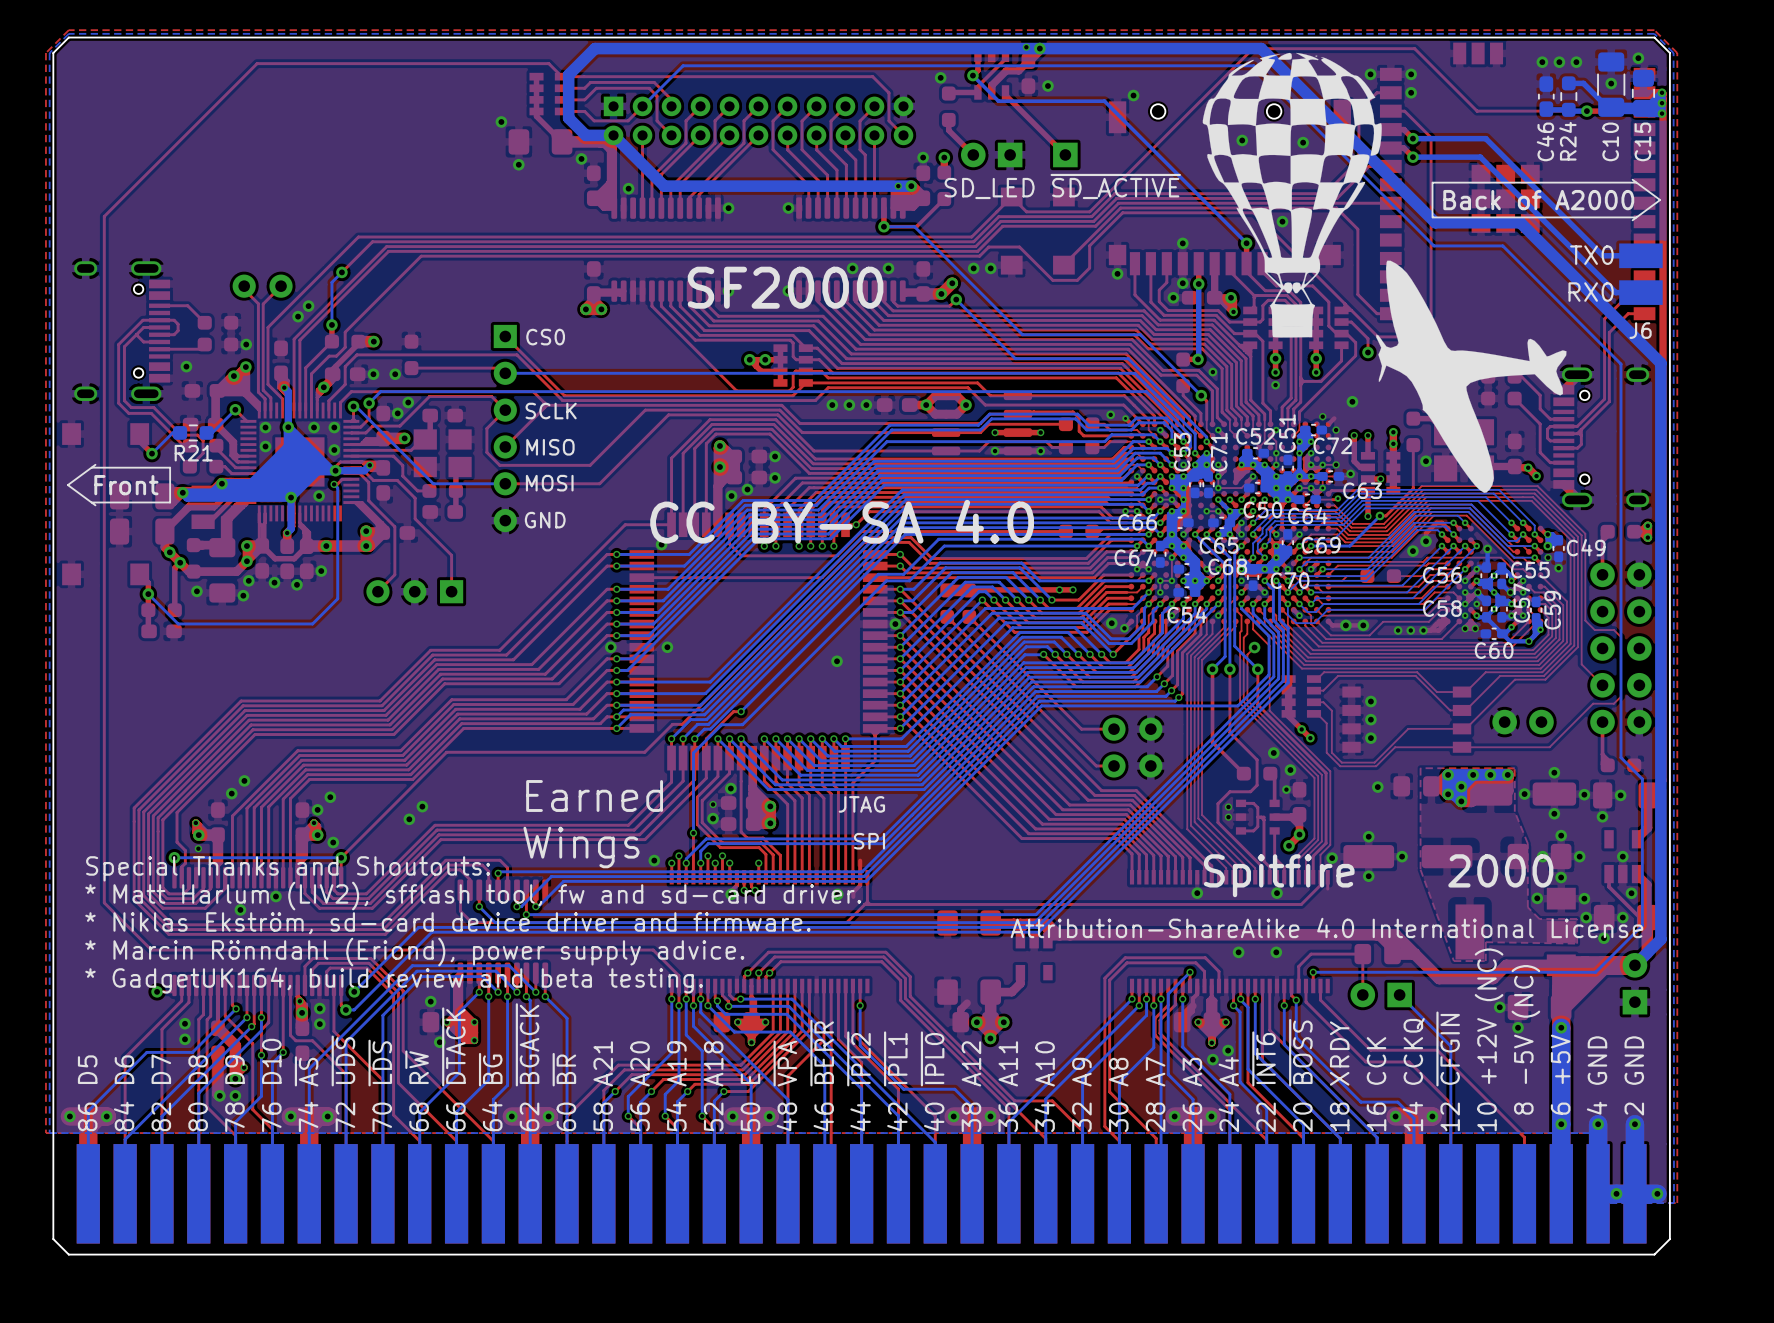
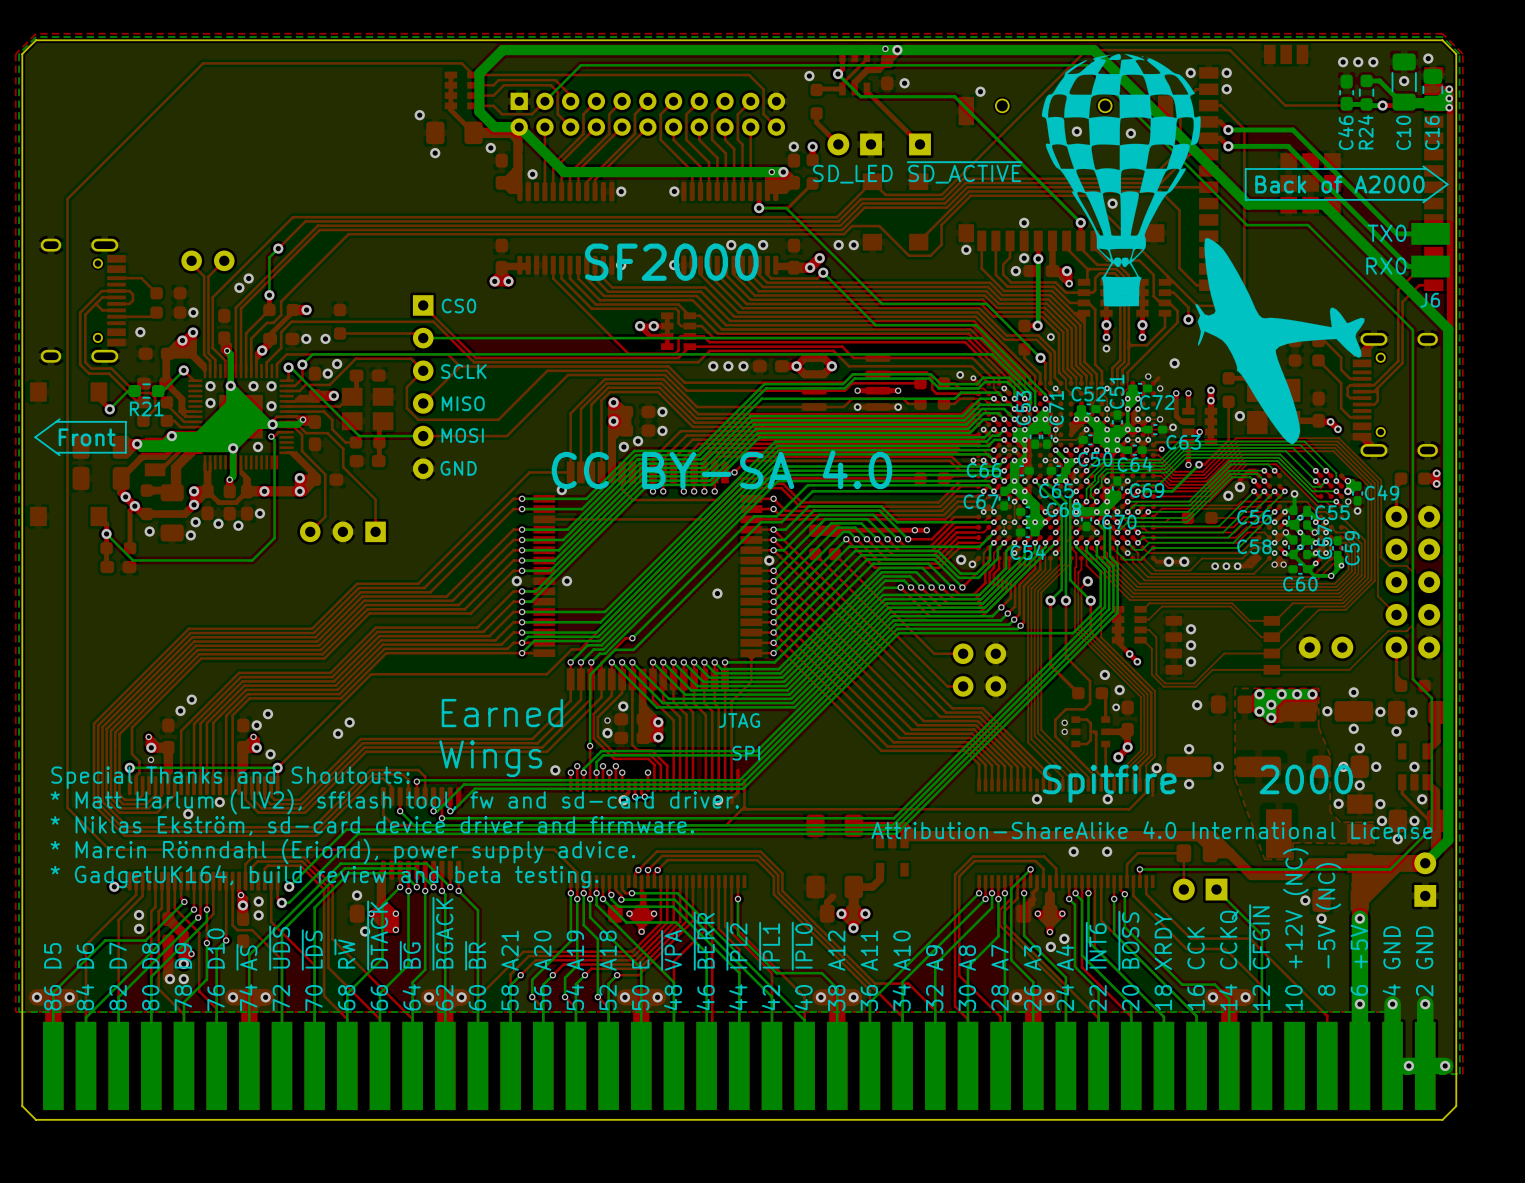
C15 name: C15 (1642, 141) -> C16 (1432, 132)

